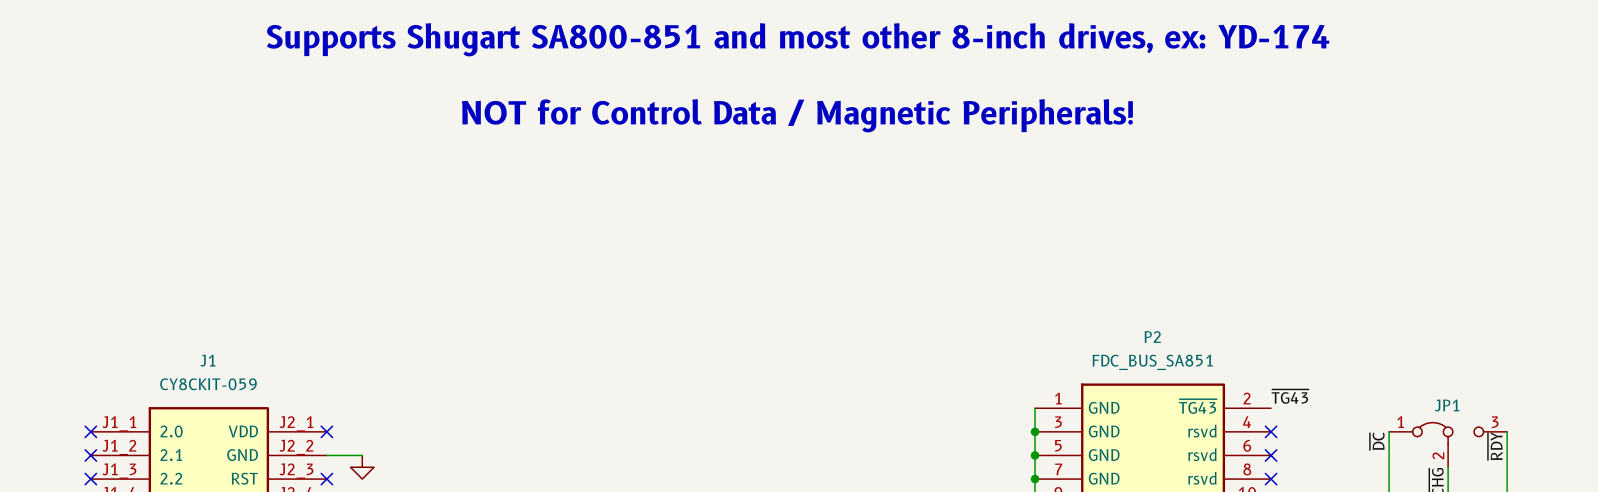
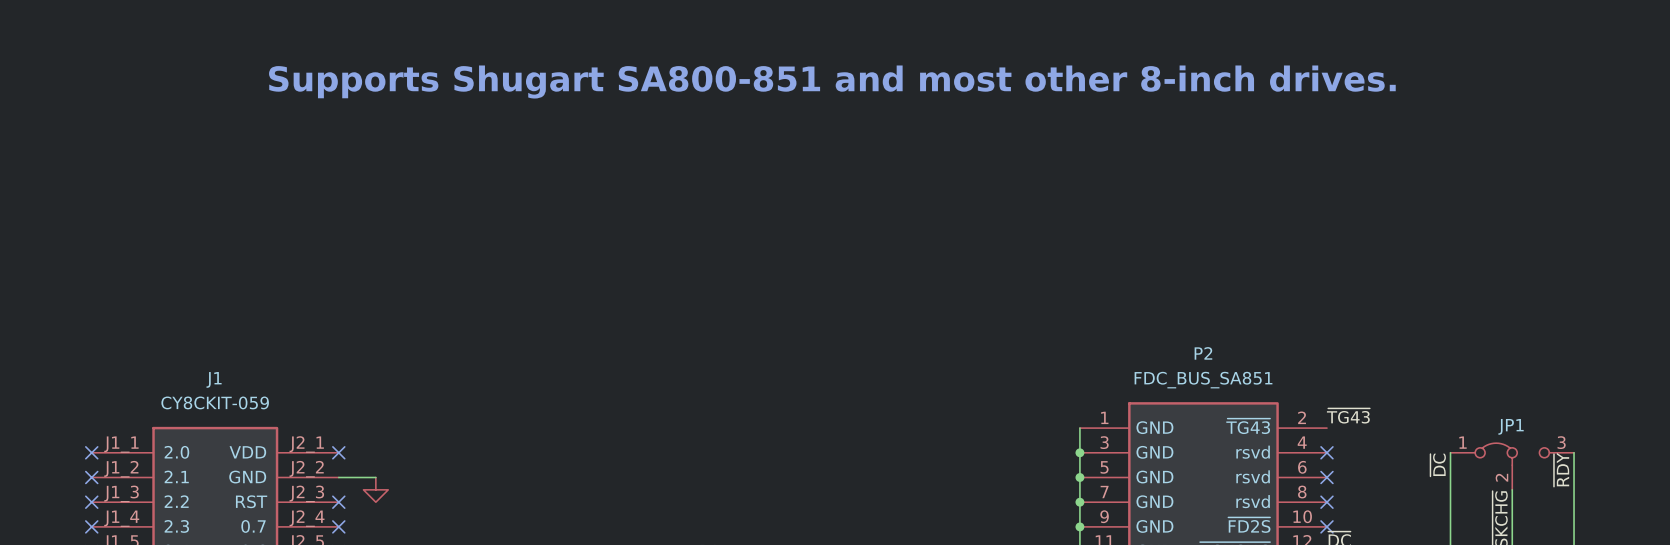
text: Supports Shugart SA800-851 and most other 8-inch drives, ex: YD-174 (798, 39) -> Supports Shugart SA800-851 and most other 8-inch drives. (832, 82)
text: NOT for Control Data / Magnetic Peripherals! (797, 115) -> none

